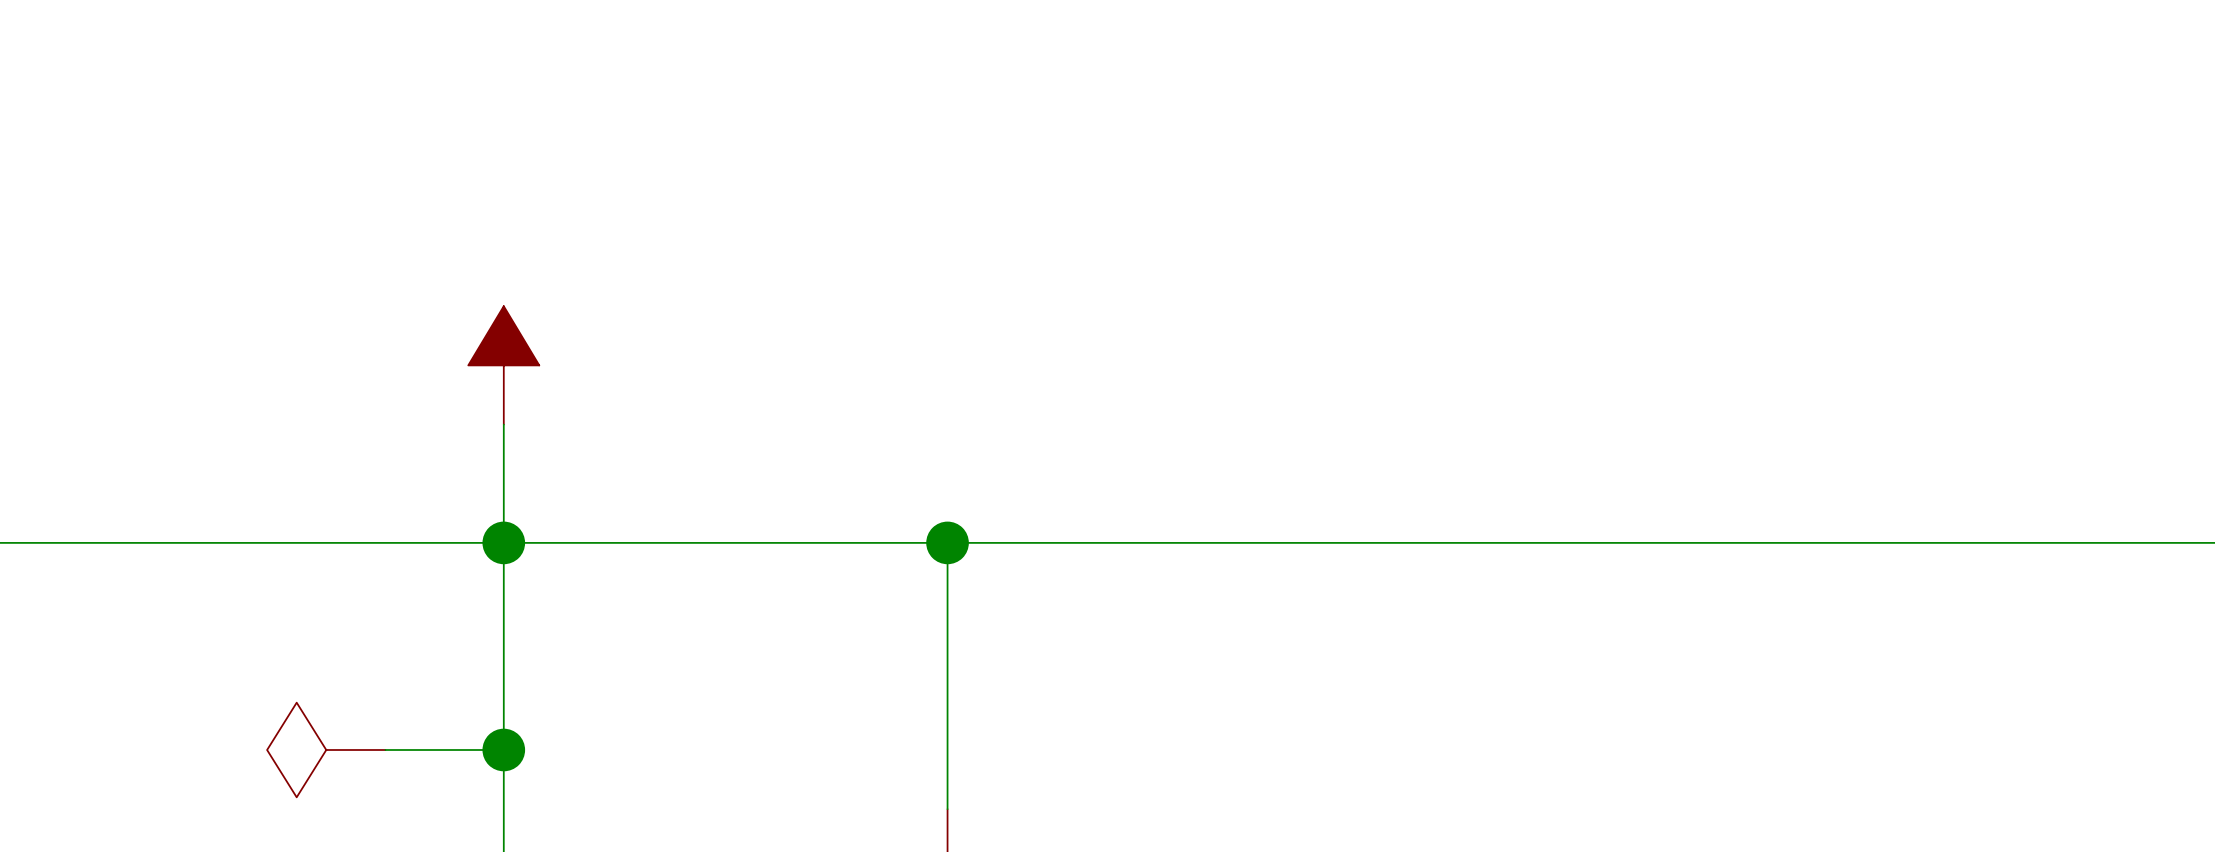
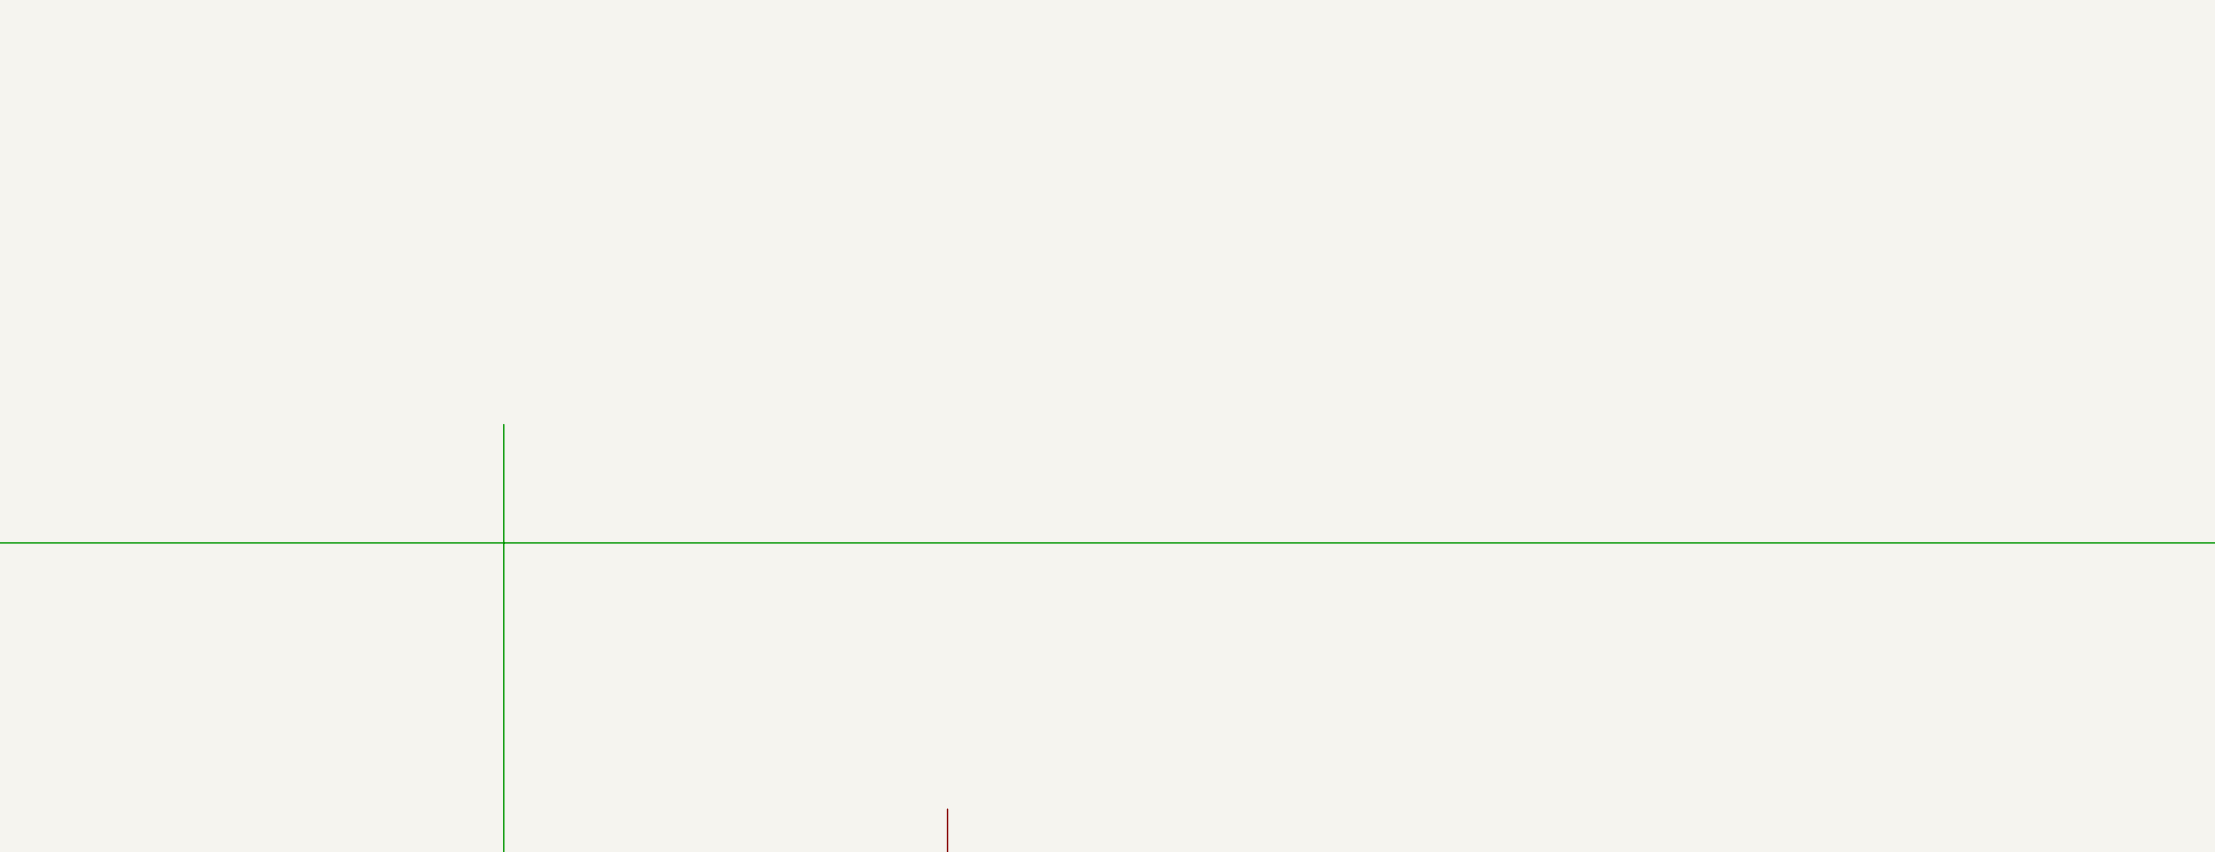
power symbol: (503, 365) -> none
junction: (503, 542) -> none
wire: (947, 542) (947, 809) -> none
junction: (947, 542) -> none
power symbol: (326, 749) -> none
wire: (385, 749) (503, 749) -> none
junction: (503, 749) -> none

